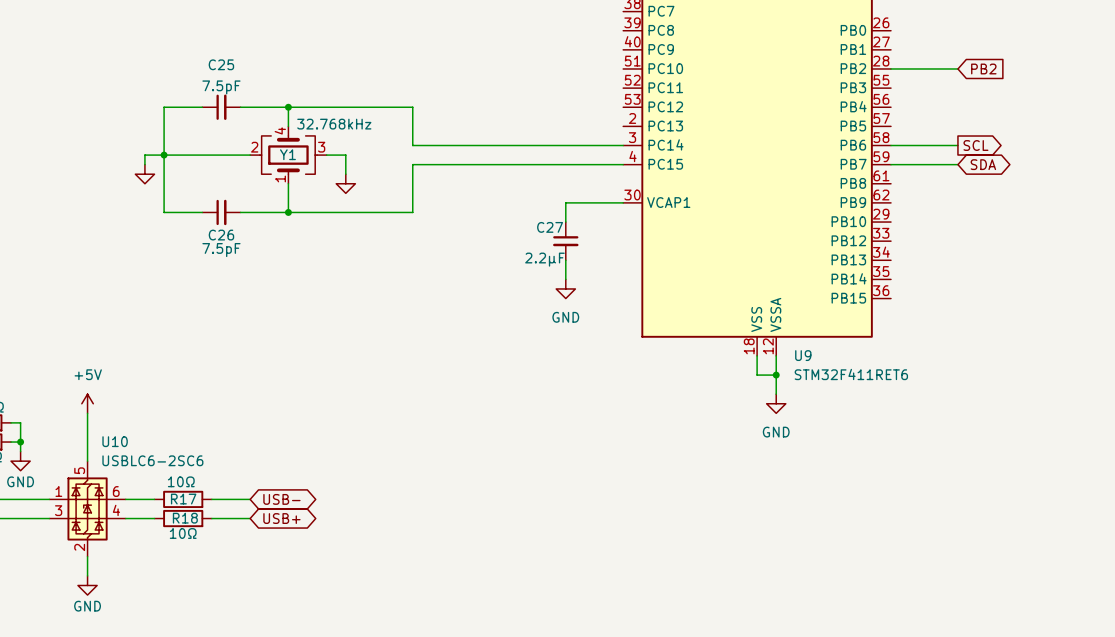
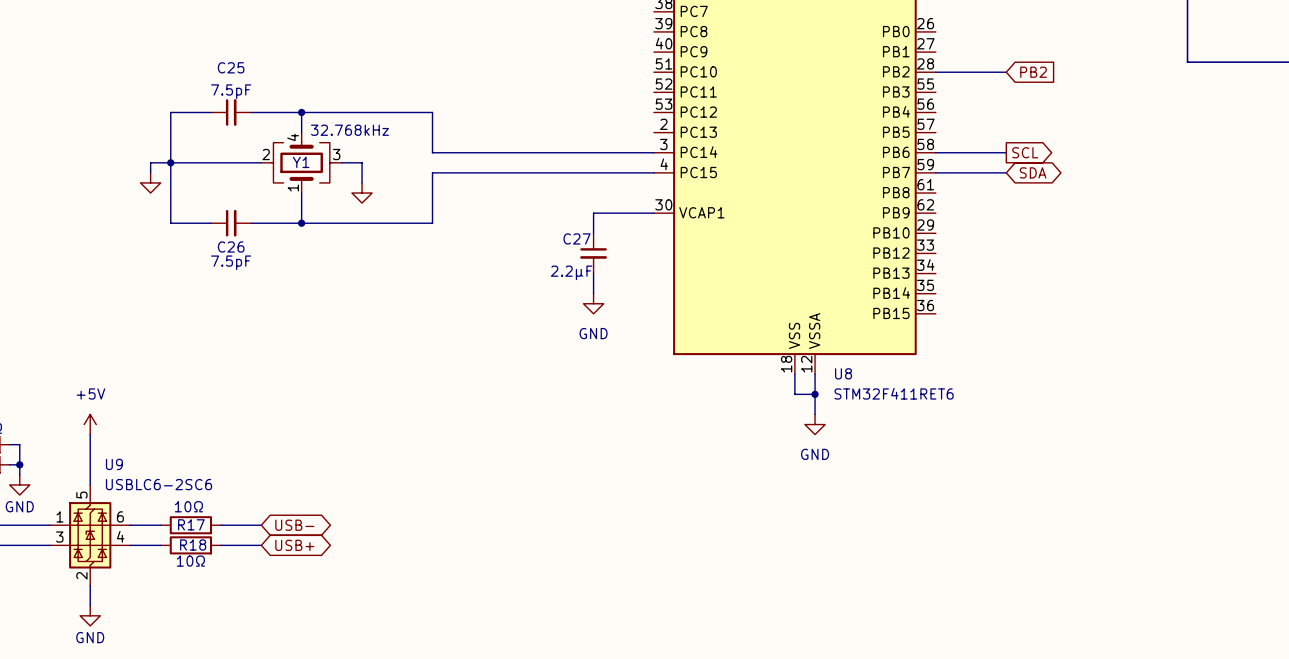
U9 name: U9 (803, 355) -> U8 (843, 373)
U10 name: U10 (115, 441) -> U9 (114, 464)

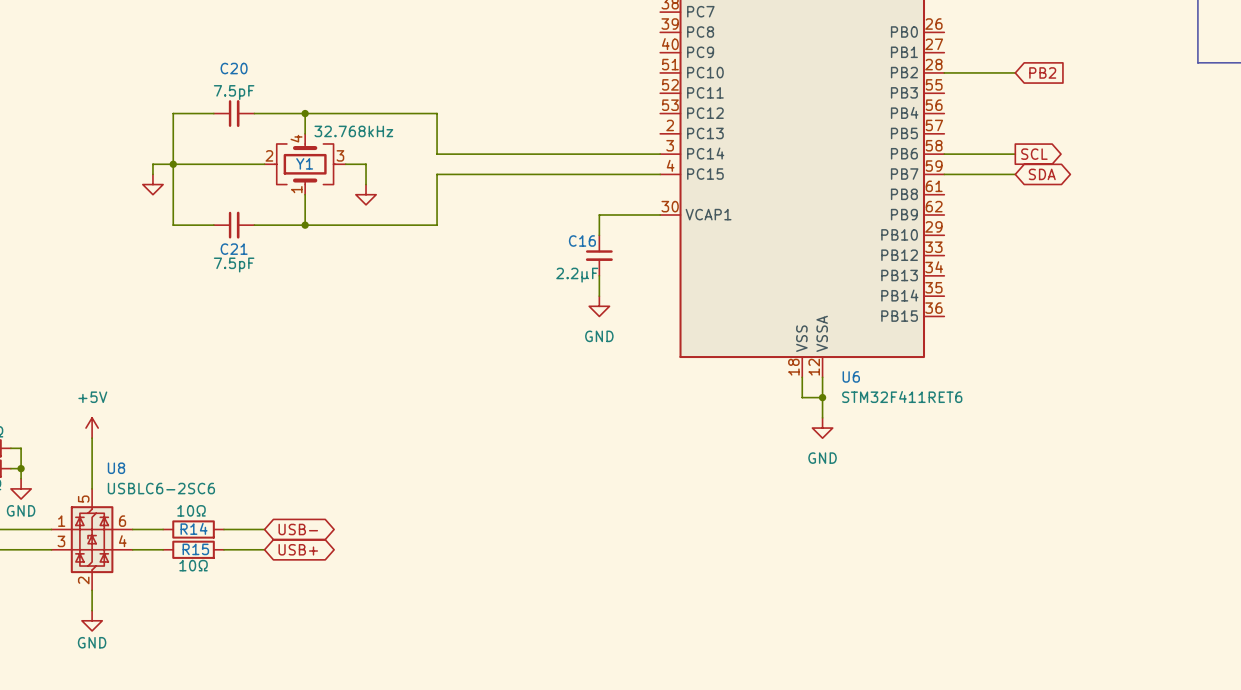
C25 name: C25 (231, 67) -> C20 (234, 68)
C27 name: C27 (577, 238) -> C16 (582, 240)
C26 name: C26 (231, 247) -> C21 (234, 249)
U8 name: U8 (843, 373) -> U6 (851, 376)
U9 name: U9 (114, 464) -> U8 (116, 468)
R17 name: R17 (191, 524) -> R14 (194, 528)
R18 name: R18 (193, 544) -> R15 (195, 549)

